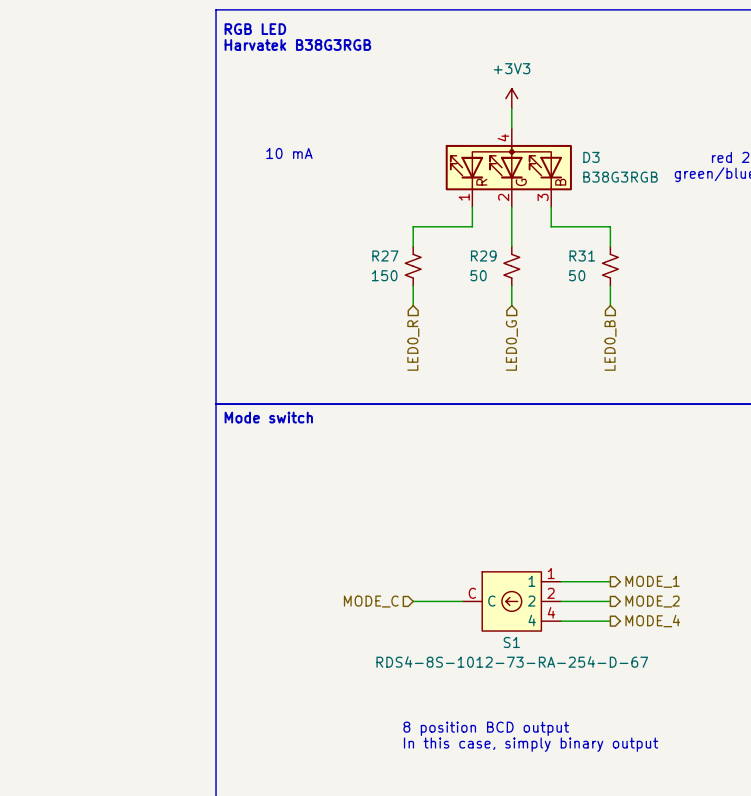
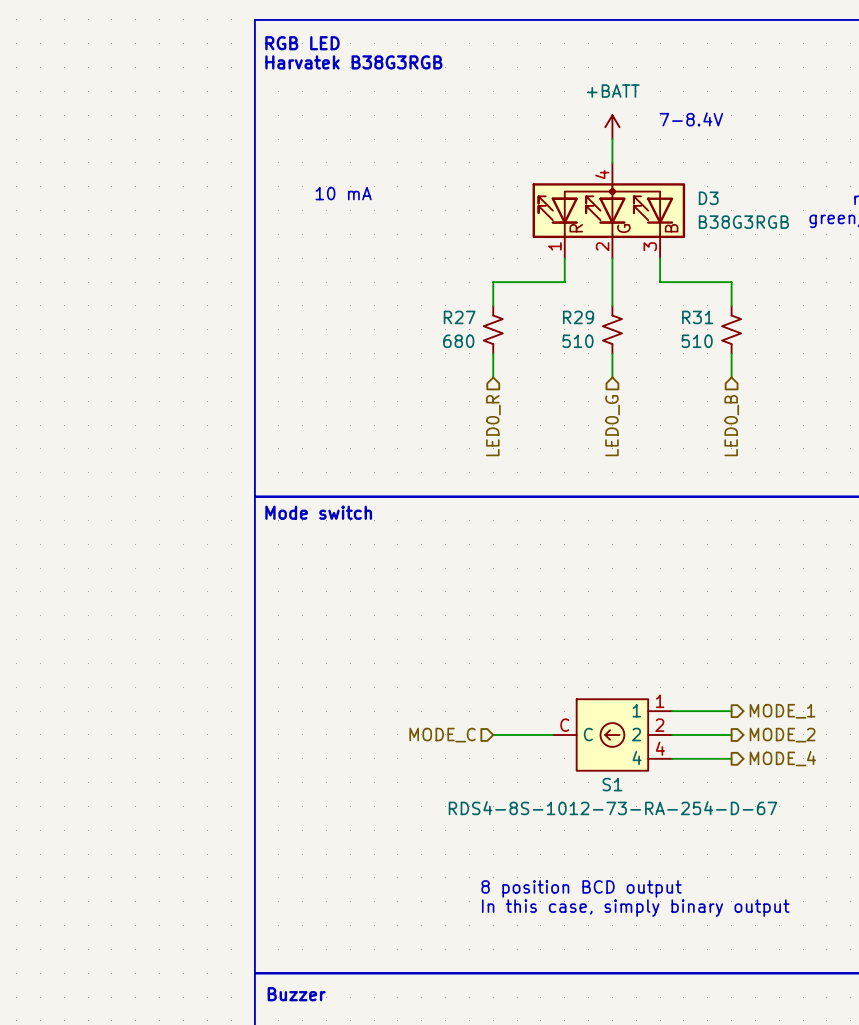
text: none -> 7-8.4V (691, 119)
power symbol: +3V3 (511, 98) -> +BATT (612, 127)
R27 value: 150 (384, 275) -> 680 (458, 341)
R29 value: 50 (478, 275) -> 510 (577, 341)
R31 value: 50 (577, 275) -> 510 (697, 341)

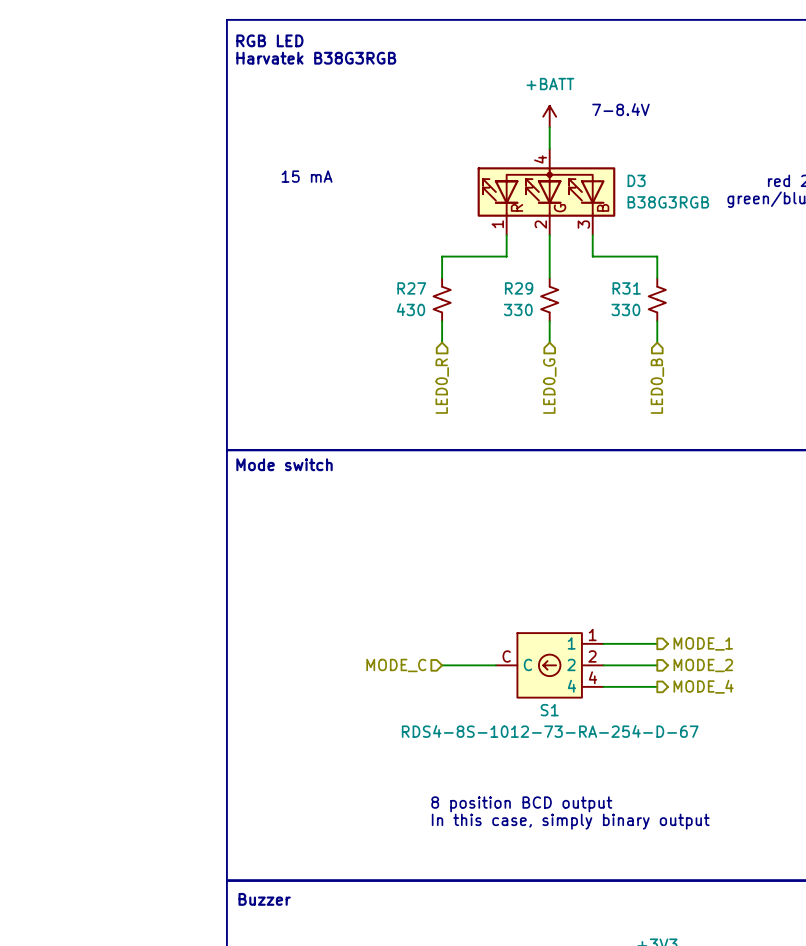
text: 10 mA (343, 193) -> 15 mA (307, 176)
R27 value: 680 (458, 341) -> 430 (410, 309)
R29 value: 510 (577, 341) -> 330 (518, 309)
R31 value: 510 (697, 341) -> 330 (625, 309)

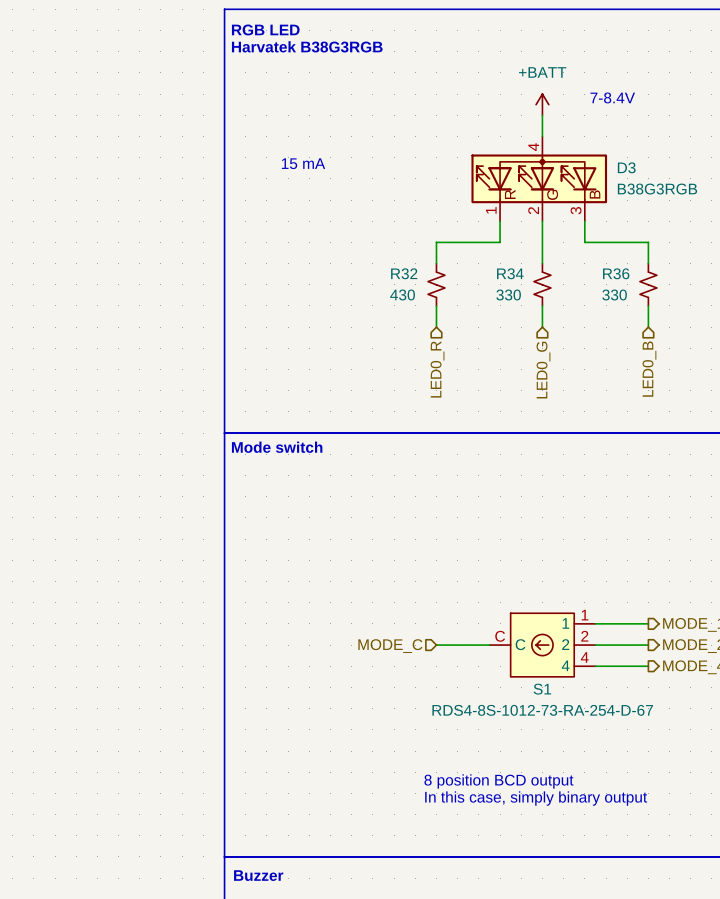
R27 name: R27 (411, 288) -> R32 (404, 273)
R29 name: R29 (519, 288) -> R34 (510, 273)
R31 name: R31 (626, 288) -> R36 (616, 273)

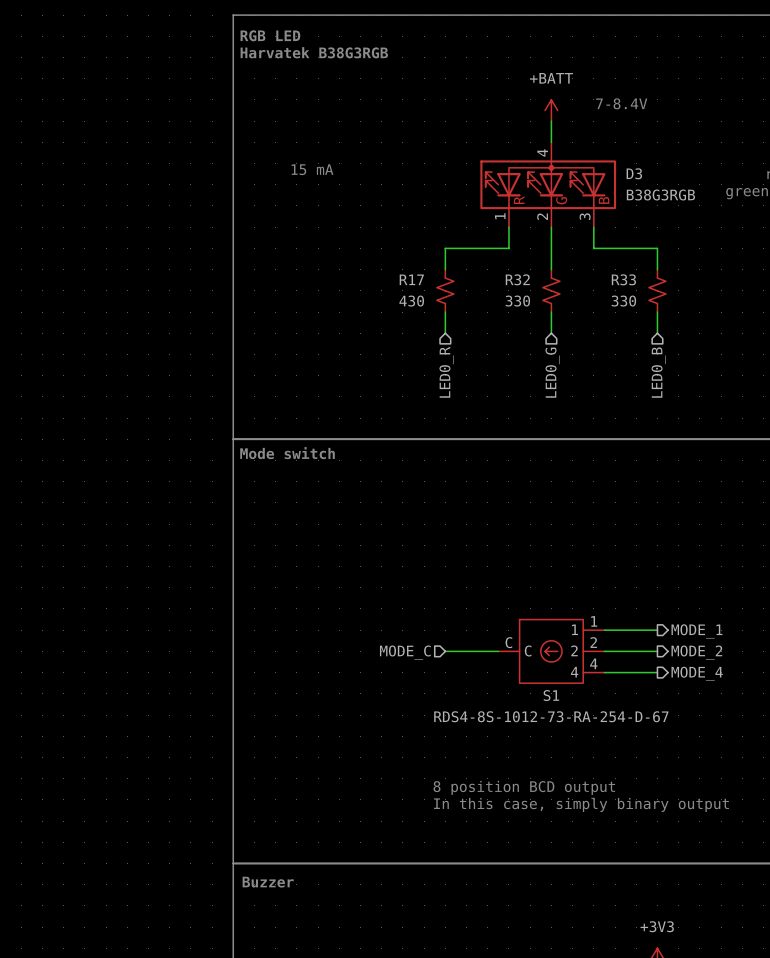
R32 name: R32 (404, 273) -> R17 (411, 279)
R34 name: R34 (510, 273) -> R32 (517, 279)
R36 name: R36 (616, 273) -> R33 (623, 279)

